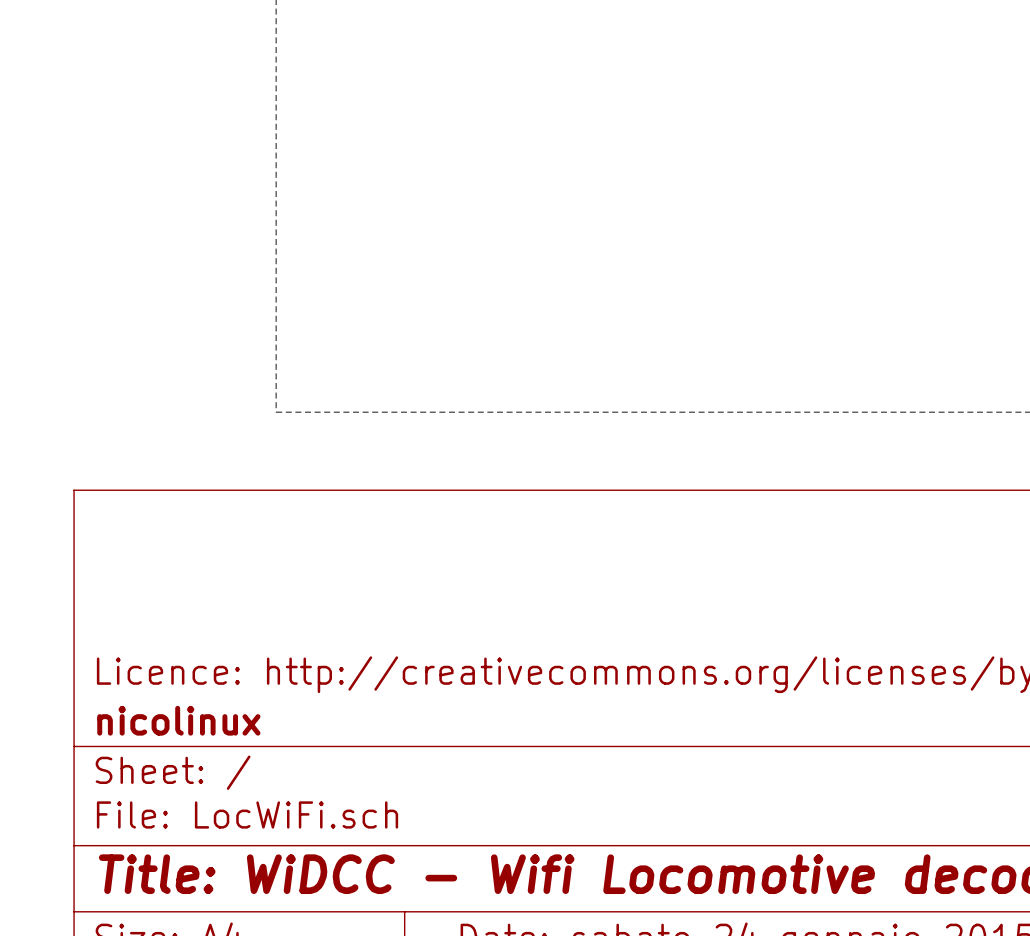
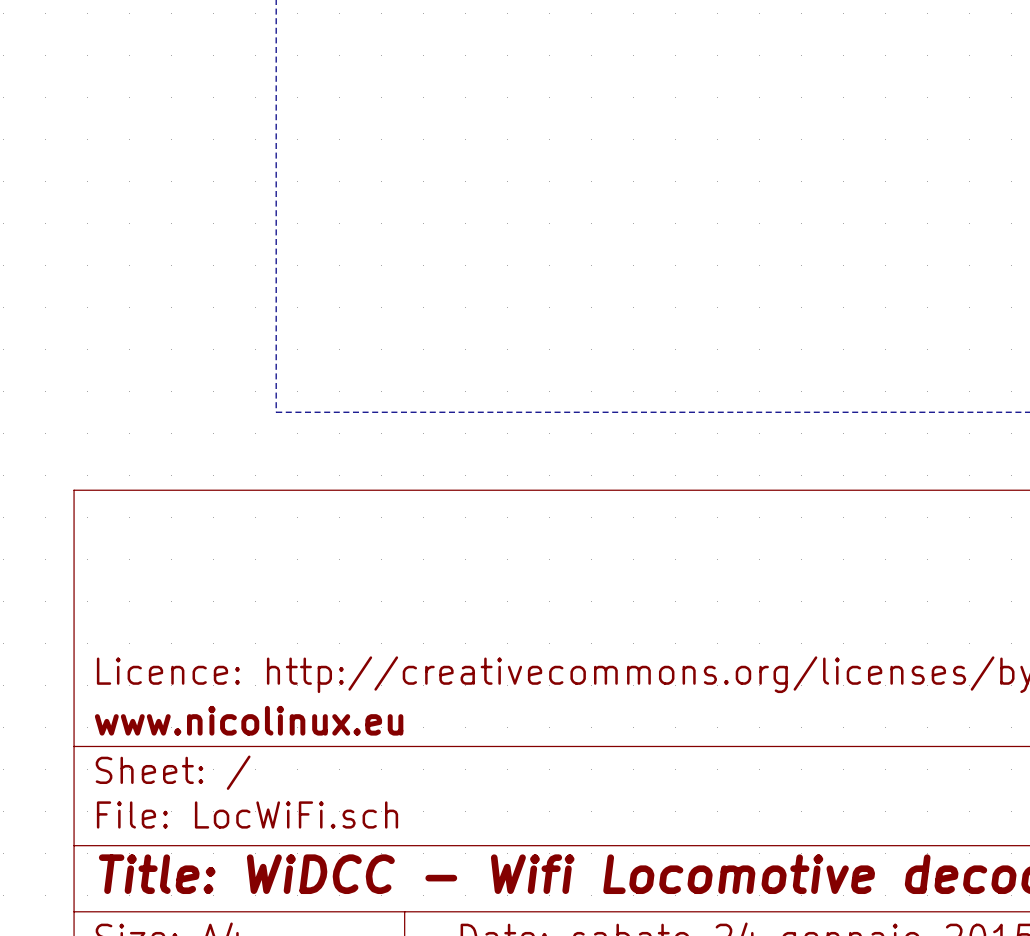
title block: nicolinux (178, 720) -> www.nicolinux.eu (249, 720)

